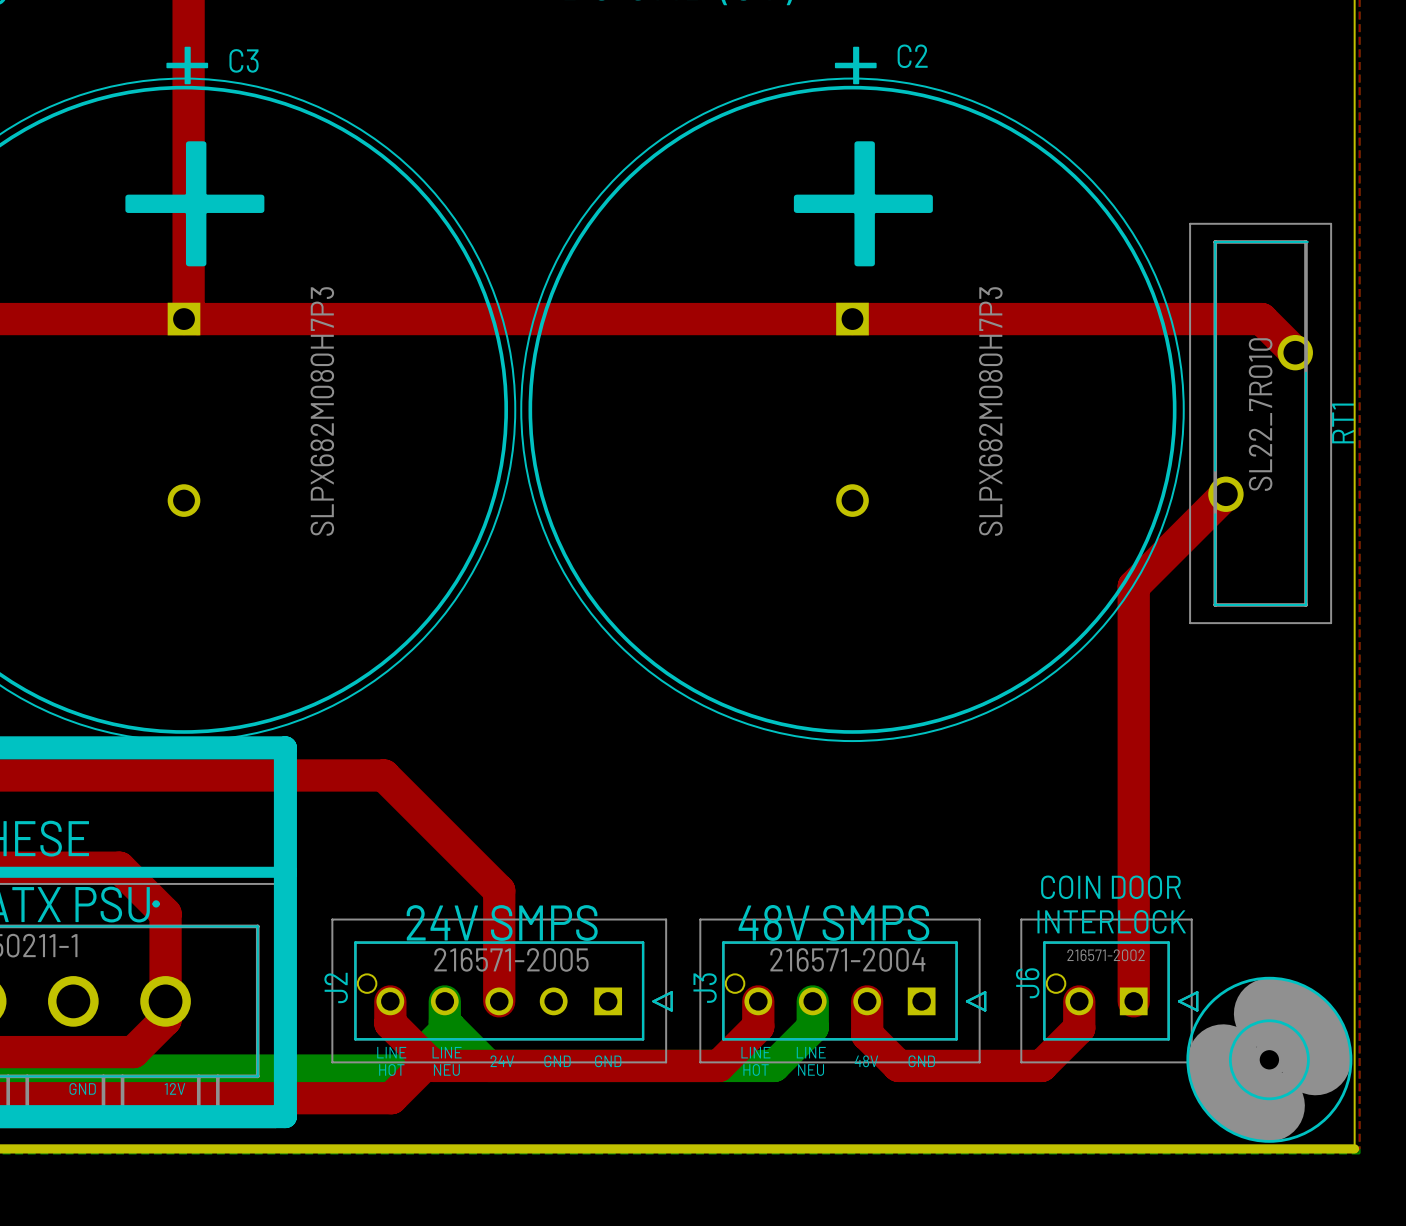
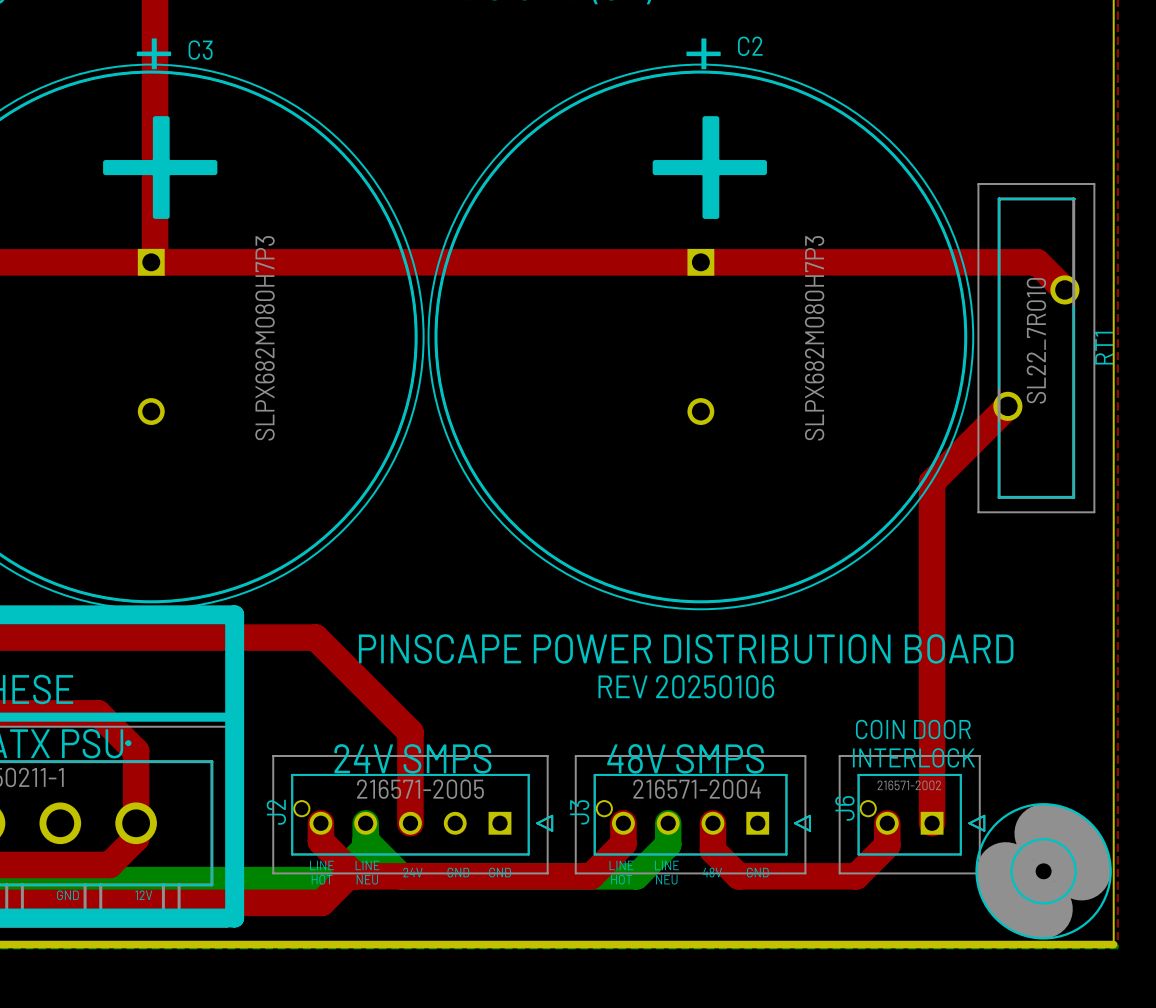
text: none -> PINSCAPE POWER DISTRIBUTION BOARD (686, 648)
text: none -> REV 20250106 (686, 686)

